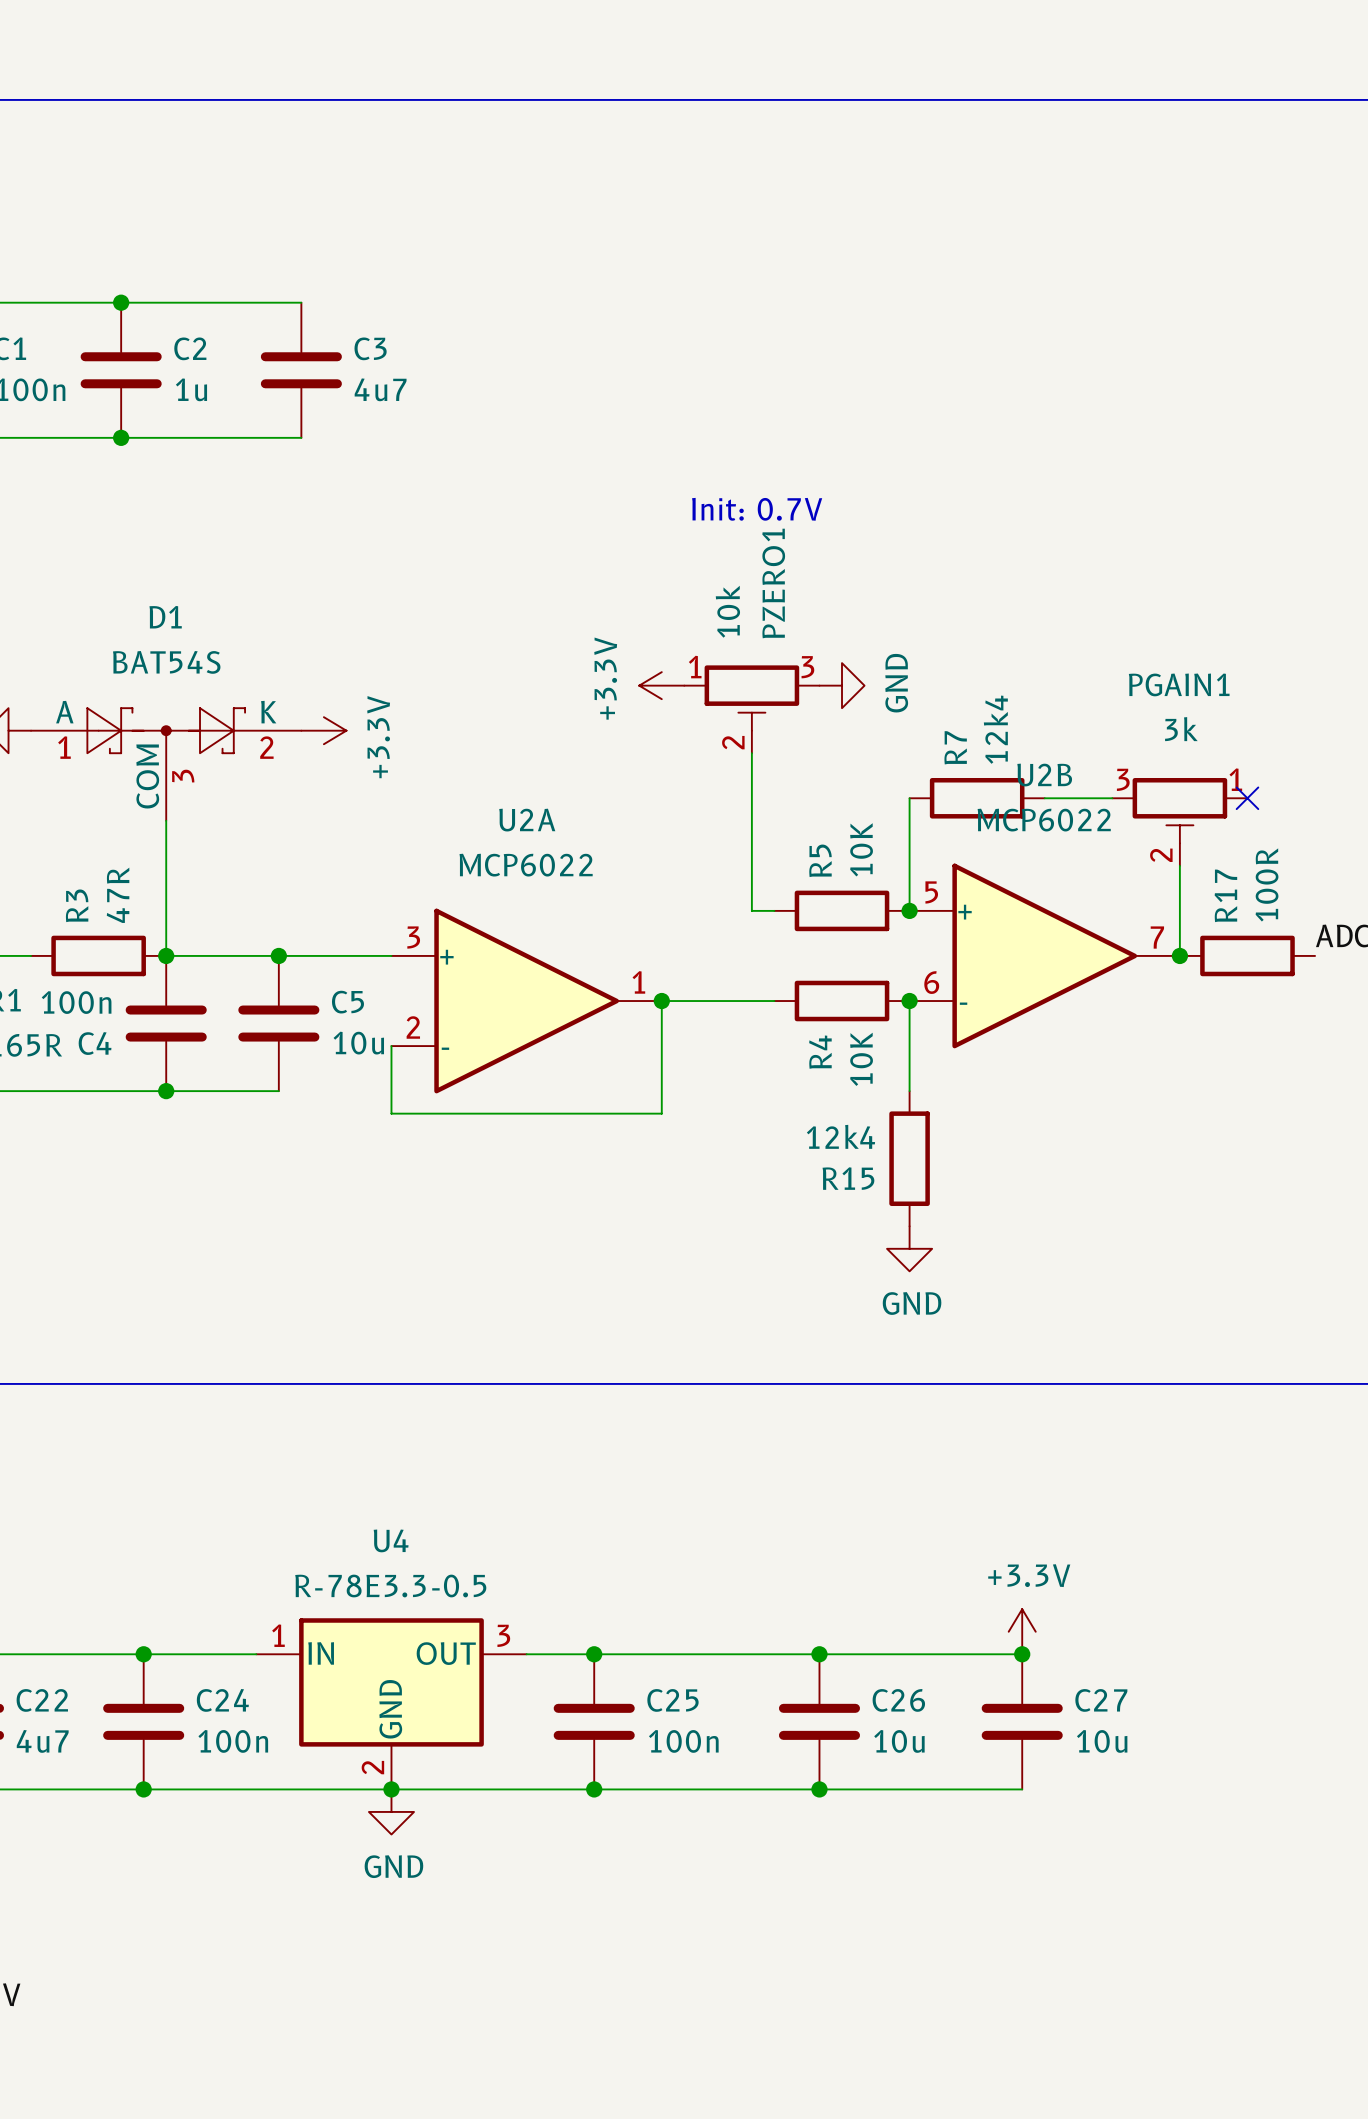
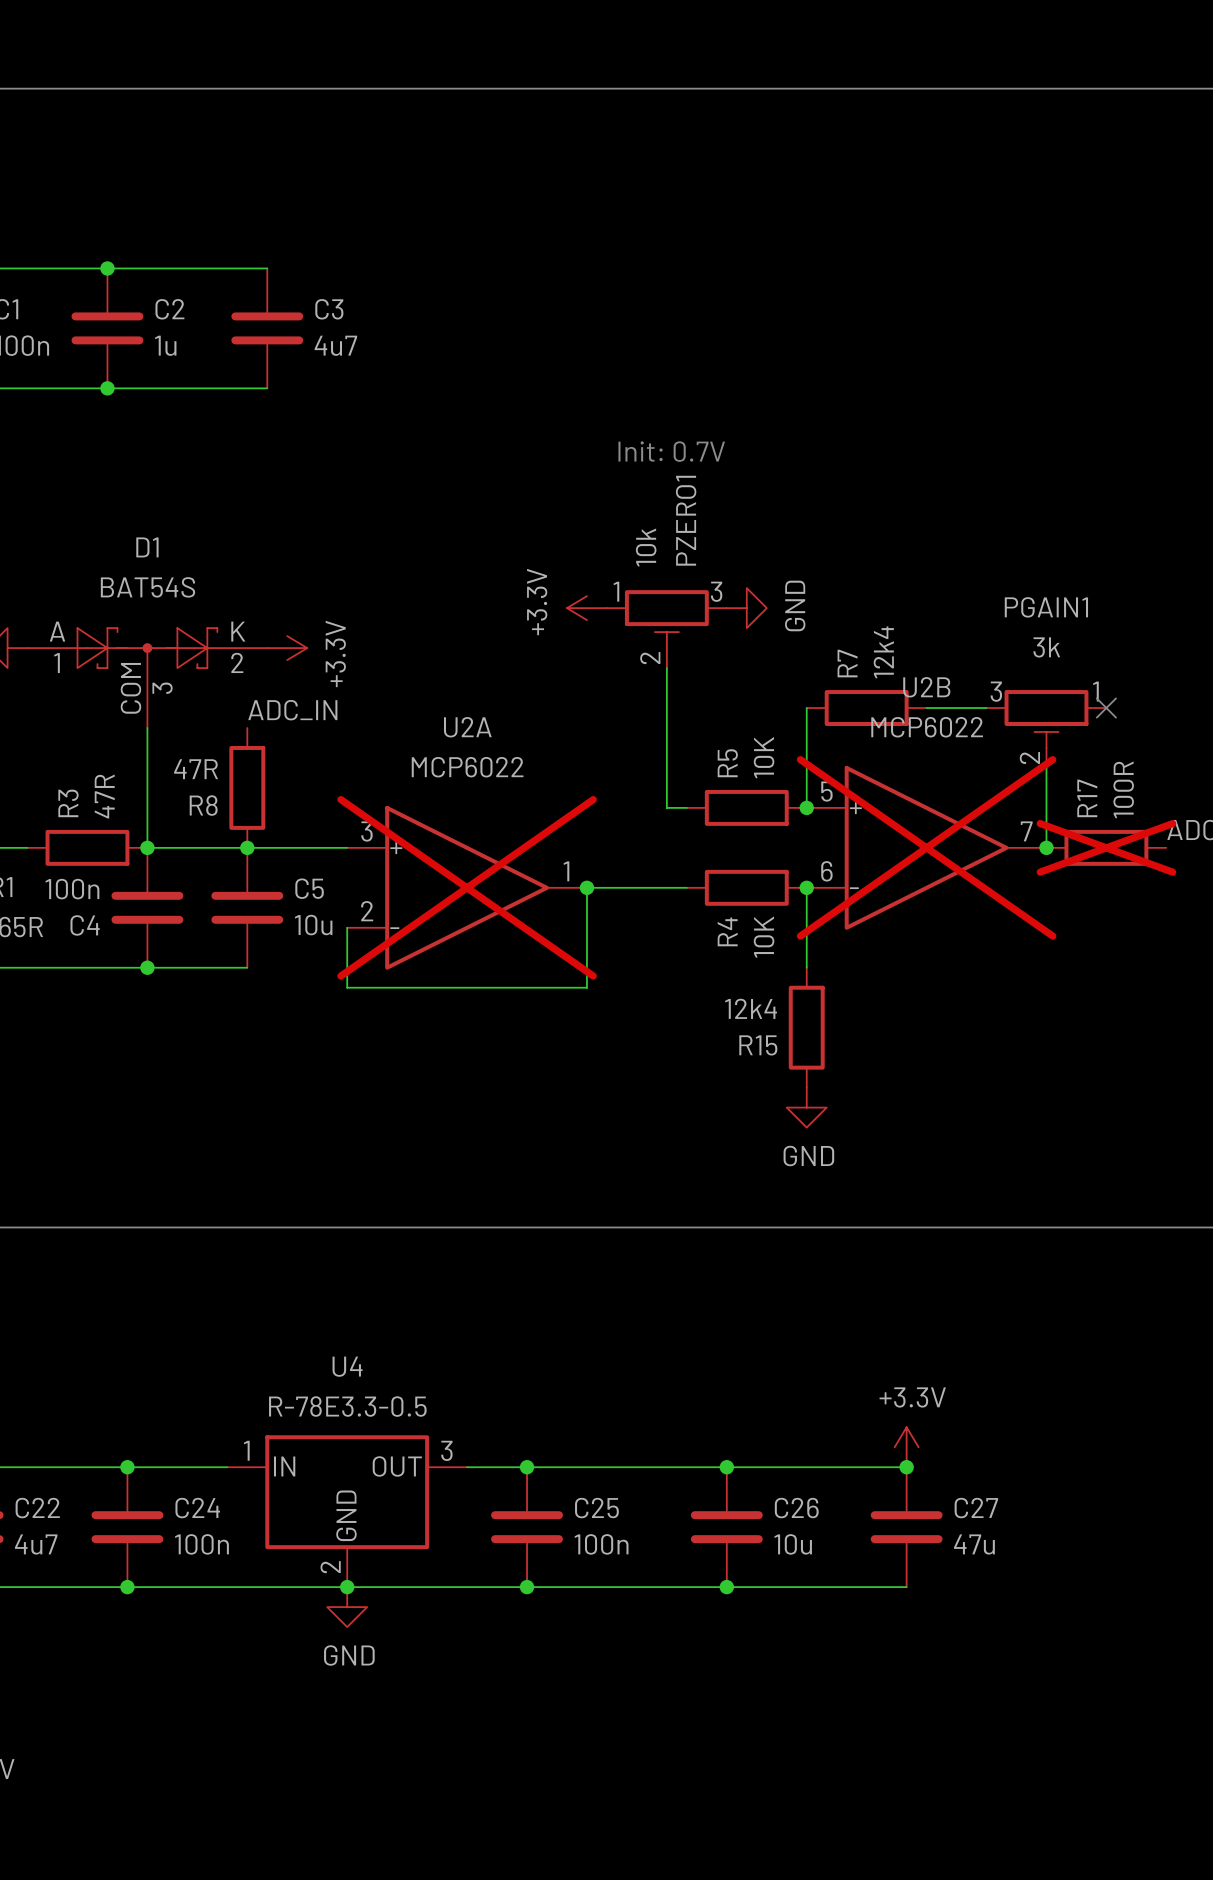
label: none -> ADC_IN (292, 710)
R8: none -> 47R (247, 787)
U2B do-not-place cross: none -> (926, 847)
R17 do-not-place cross: none -> (1106, 847)
U2A do-not-place cross: none -> (467, 887)
C27 value: 10u (1102, 1741) -> 47u (974, 1544)

